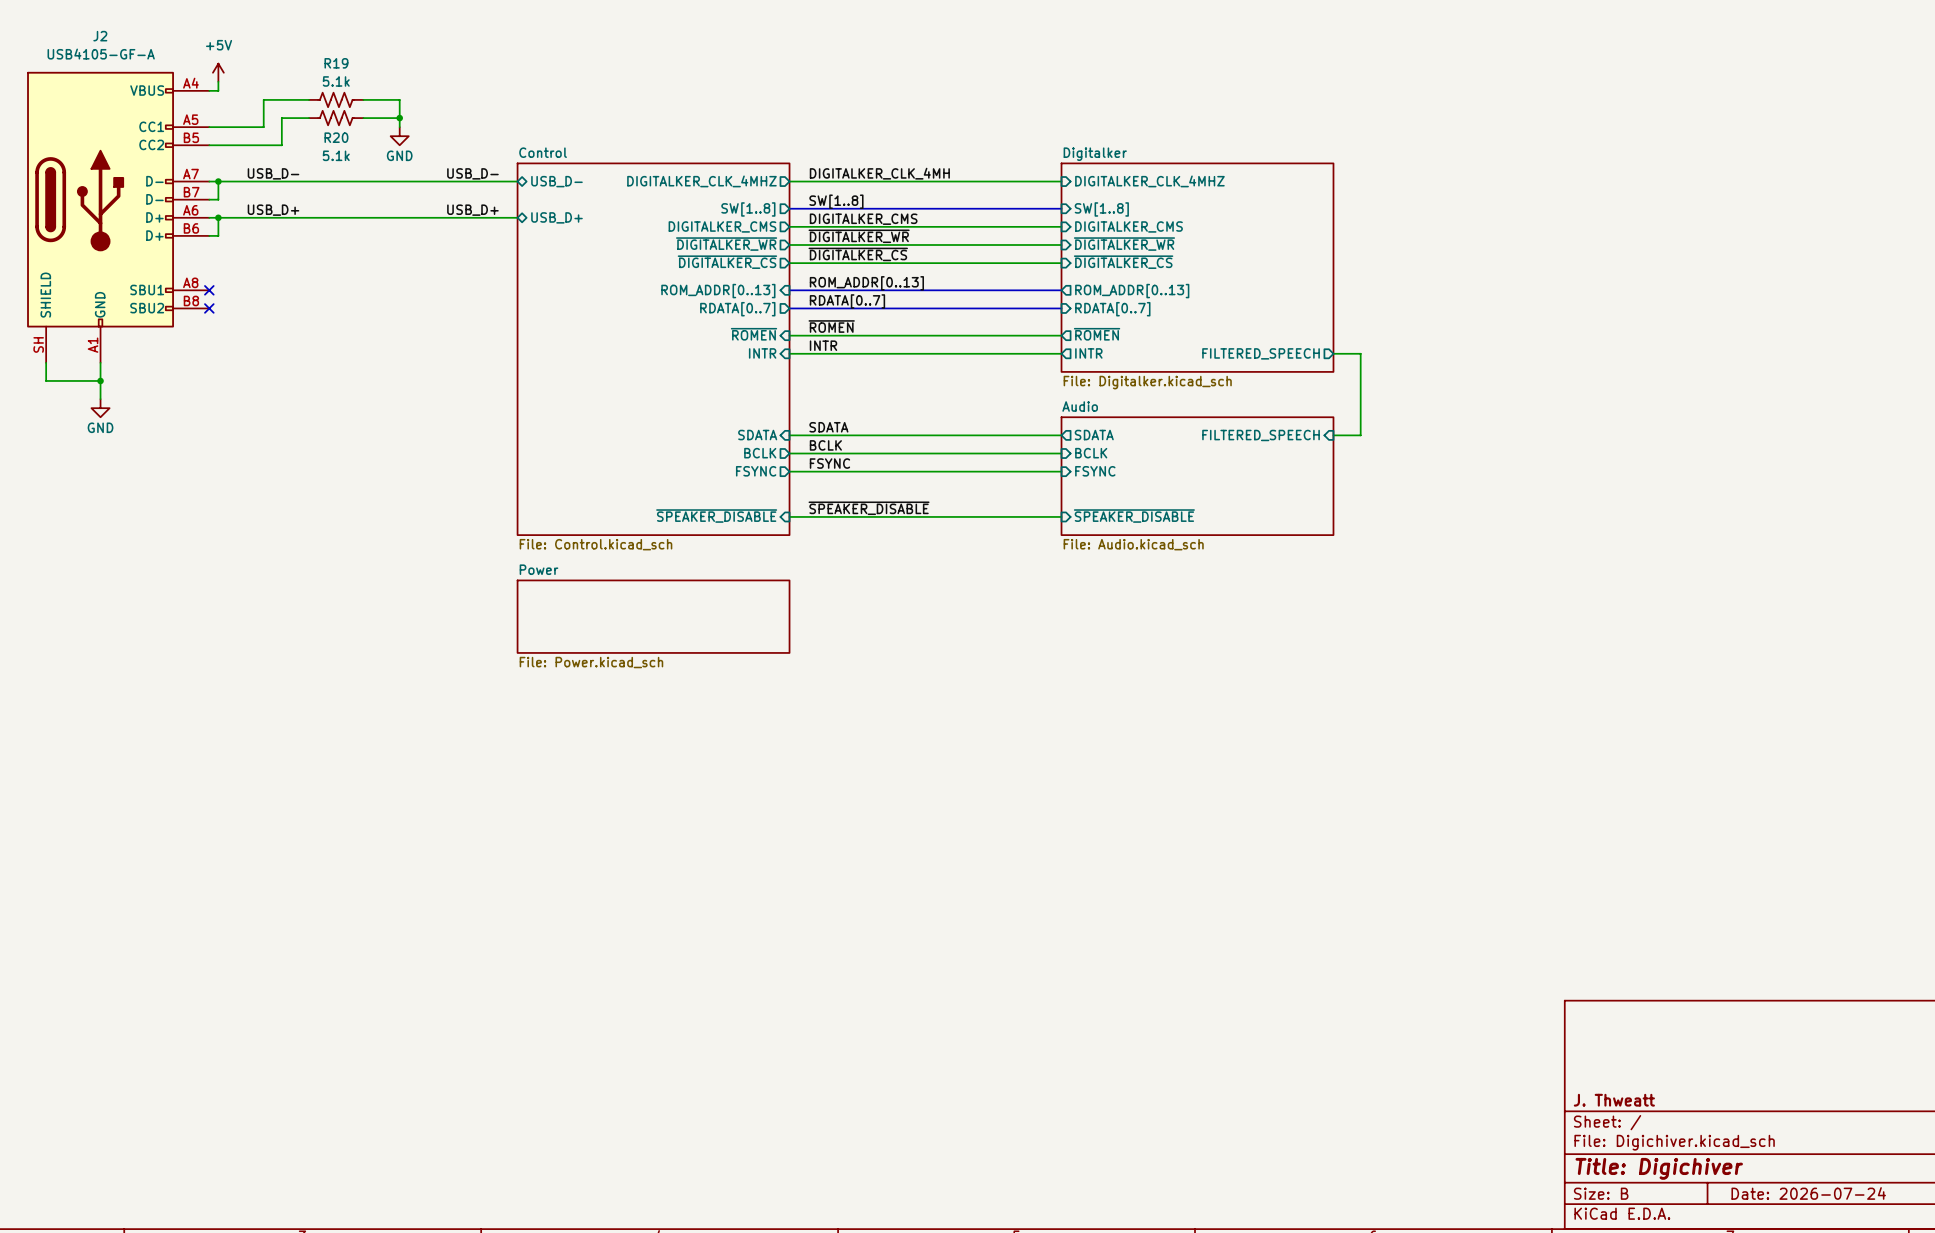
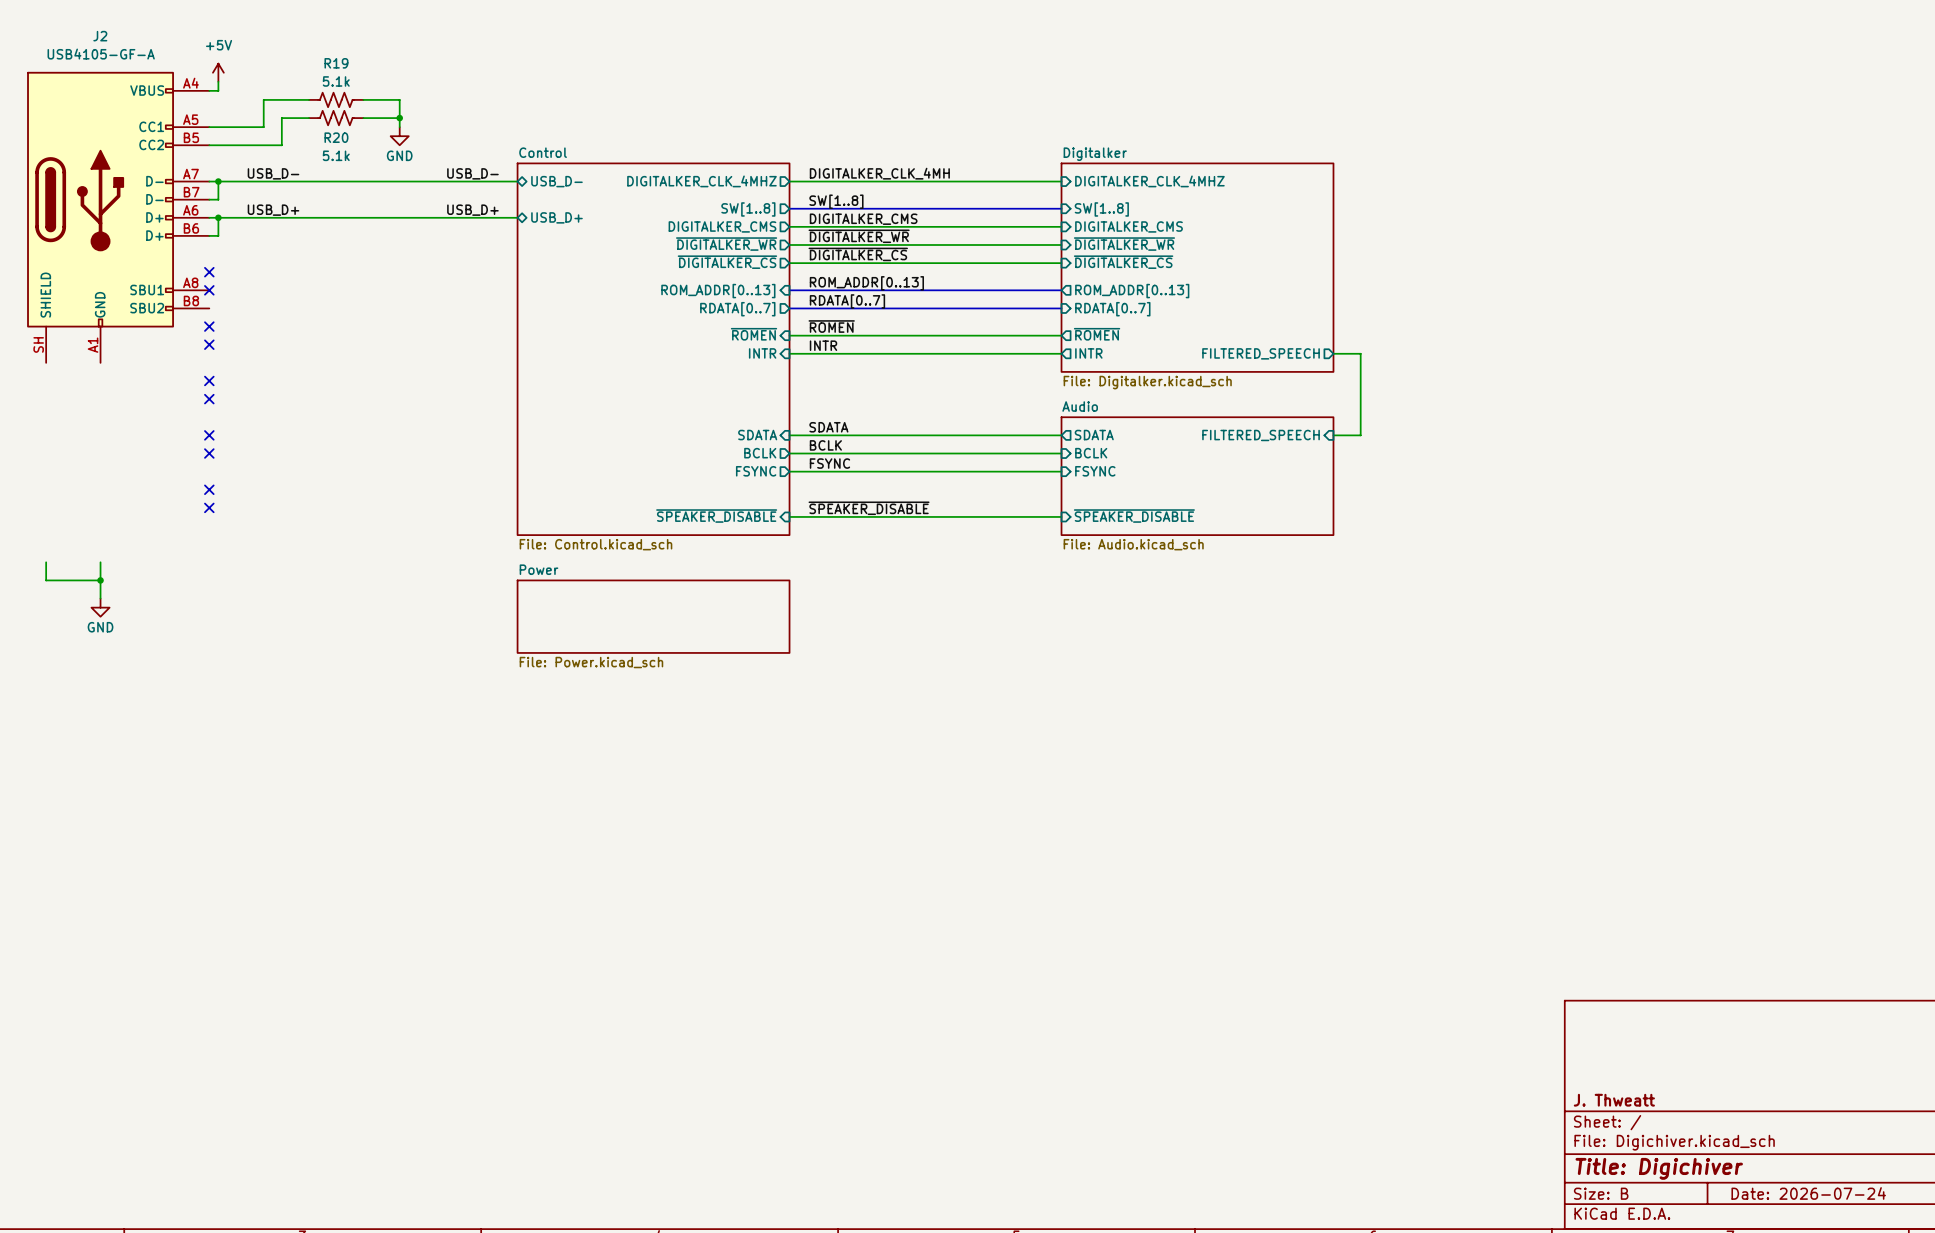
no-connect mark: none -> (209, 272)
no-connect mark: (209, 308) -> none
no-connect mark: none -> (209, 326)
no-connect mark: none -> (209, 344)
wire: (46, 362) (46, 380) (100, 380) -> none
wire: (100, 362) (100, 399) -> none
junction: (100, 380) -> none
no-connect mark: none -> (209, 380)
no-connect mark: none -> (209, 399)
power symbol: GND (100, 408) -> none
no-connect mark: none -> (209, 435)
no-connect mark: none -> (209, 453)
no-connect mark: none -> (209, 489)
no-connect mark: none -> (209, 507)
wire: none -> (46, 562) (46, 580) (100, 580)
wire: none -> (100, 562) (100, 598)
junction: none -> (100, 580)
power symbol: none -> GND (100, 607)

